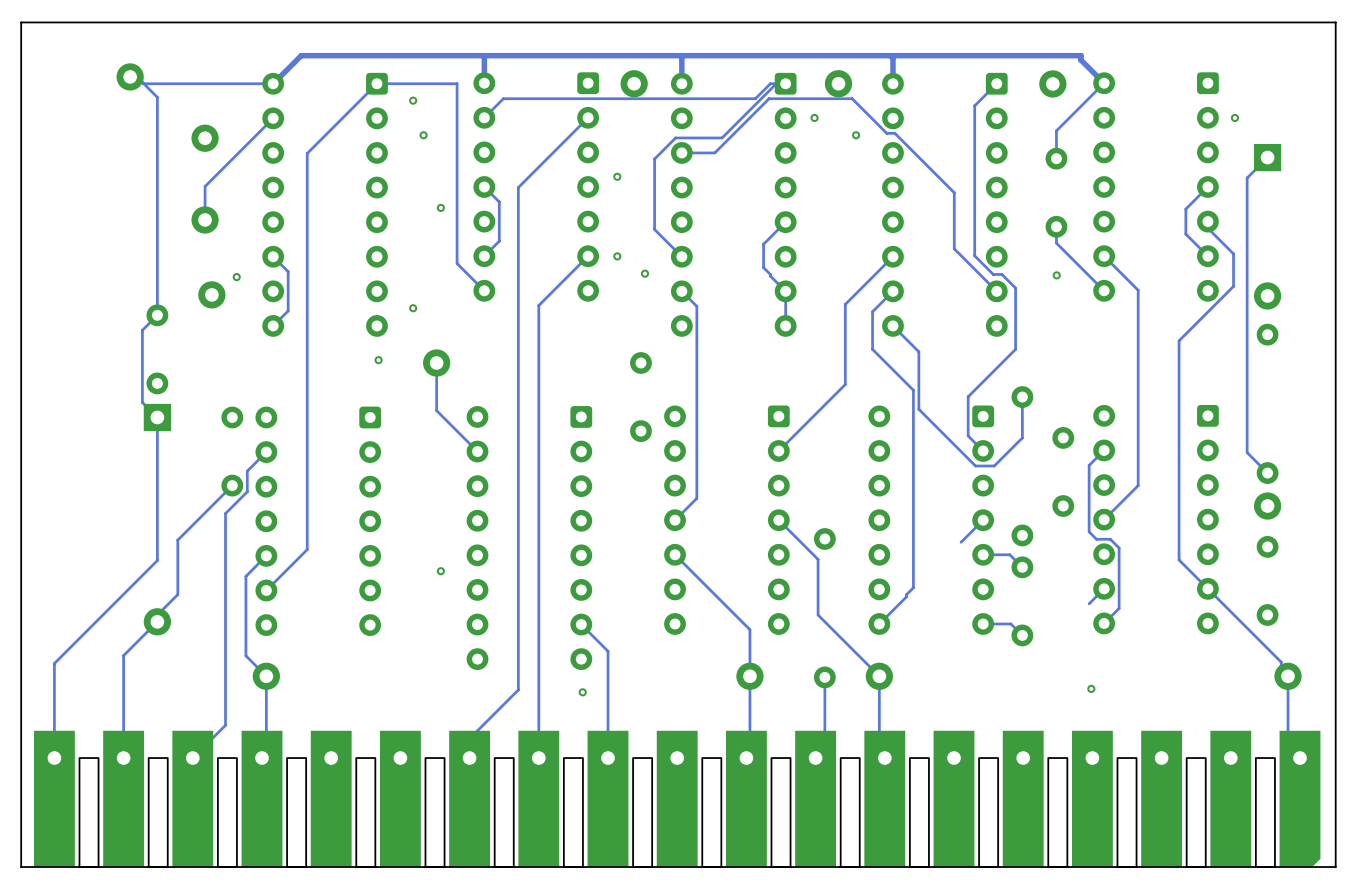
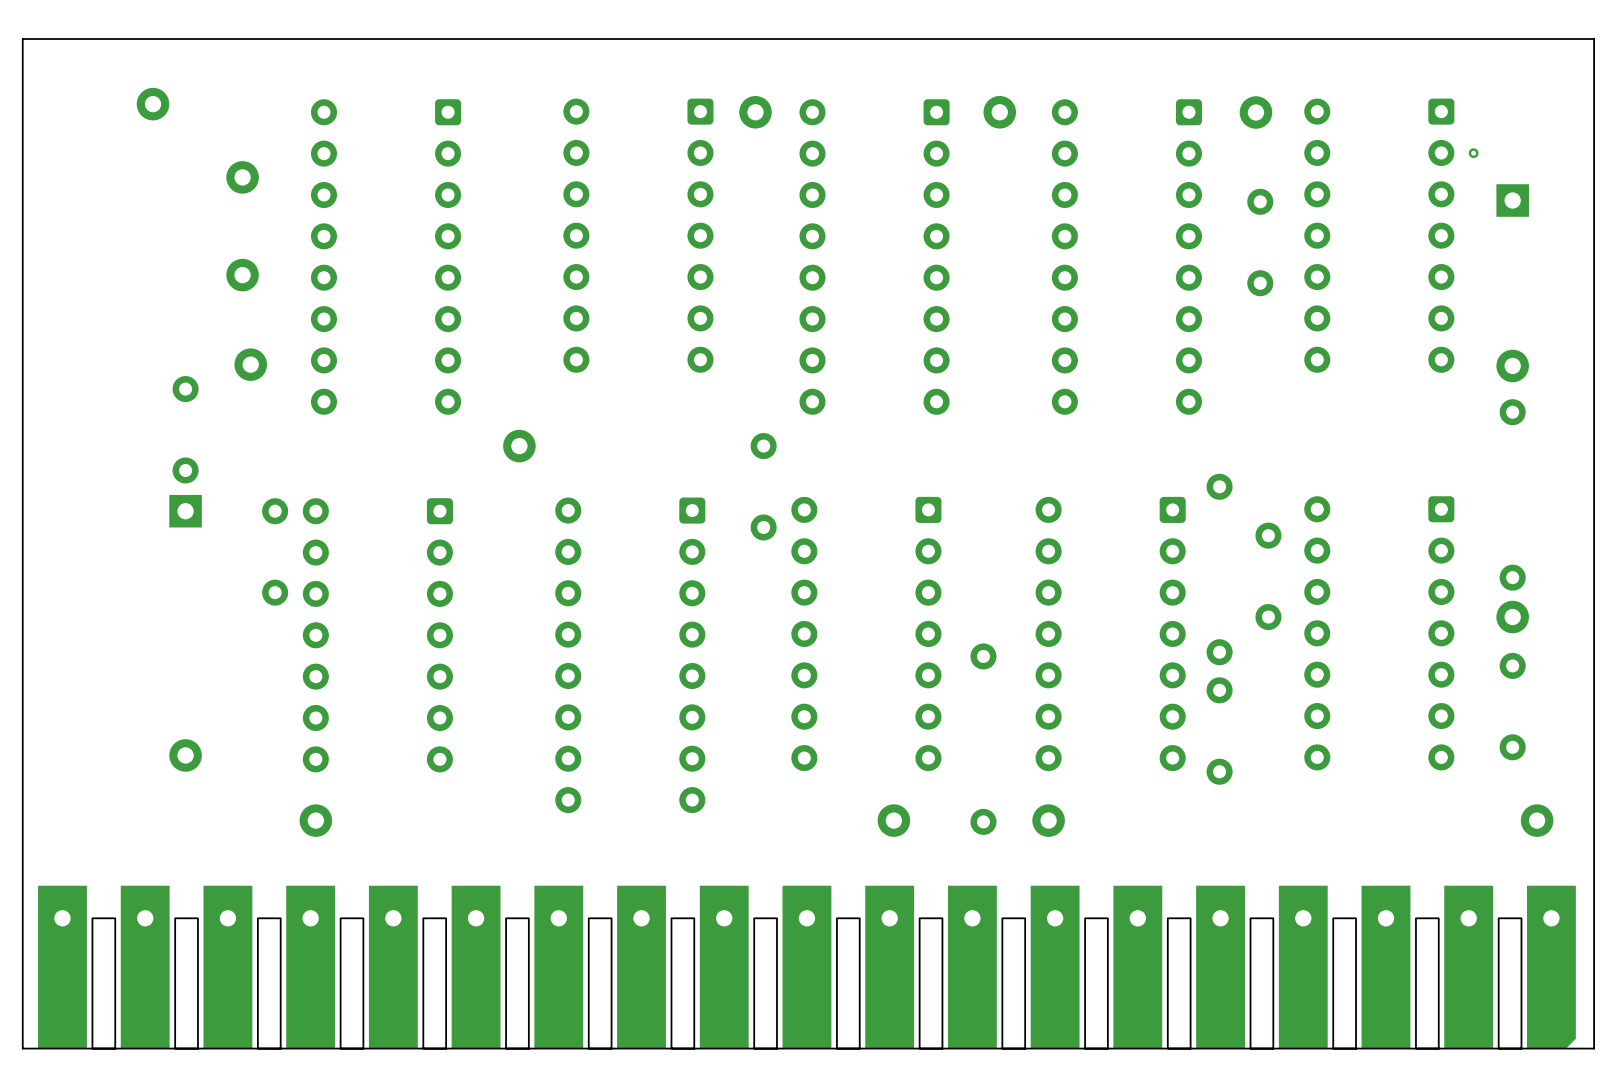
track: (484, 55) (484, 83) -> none
track: (683, 55) (681, 83) -> none
track: (890, 55) (892, 58) (892, 83) -> none
track: (130, 76) (136, 76) (157, 97) (157, 315) (142, 330) (142, 402) (157, 417) (157, 560) (54, 663) (54, 758) -> none
track: (143, 83) (273, 83) (301, 55) (1080, 55) (1080, 60) (1104, 83) (1056, 130) (1056, 158) -> none
track: (776, 83) (722, 137) (675, 137) (654, 158) (654, 229) (681, 256) -> none
track: (785, 83) (770, 83) (755, 98) (503, 98) (484, 117) -> none
track: (996, 83) (974, 105) (974, 255) (993, 274) (1001, 274) (1015, 288) (1015, 349) (968, 396) (968, 436) (983, 450) -> none
via: (413, 100) -> none
track: (588, 117) (518, 187) (518, 689) (469, 738) (469, 758) -> none
via: (814, 117) -> none
track: (273, 118) (205, 186) (205, 219) -> none
via: (423, 135) -> none
via: (856, 135) -> none
track: (681, 152) (714, 152) (769, 98) (852, 98) (886, 133) (894, 133) (954, 192) (954, 248) (996, 291) -> none
track: (1267, 157) (1247, 178) (1247, 452) (1267, 473) -> none
via: (617, 176) -> none
track: (484, 187) (499, 201) (499, 241) (484, 256) -> none
track: (1207, 187) (1185, 209) (1185, 234) (1207, 256) -> none
via: (440, 207) -> none
track: (1207, 221) (1207, 228) (1233, 253) (1233, 286) (1179, 340) (1179, 559) (1281, 662) (1281, 669) (1288, 676) (1288, 746) (1300, 758) -> none
track: (785, 222) (763, 244) (763, 267) (785, 291) (785, 325) -> none
track: (1056, 226) (1056, 243) (1104, 290) -> none
track: (273, 256) (288, 271) (288, 310) (273, 325) -> none
track: (588, 256) (538, 305) (538, 758) -> none
via: (617, 256) -> none
track: (892, 256) (845, 304) (845, 384) (778, 450) -> none
track: (1104, 256) (1138, 290) (1138, 485) (1104, 519) -> none
via: (645, 273) -> none
via: (1056, 275) -> none
via: (236, 277) -> none
track: (484, 290) (457, 263) (457, 83) (376, 83) (307, 153) (307, 549) (266, 590) -> none
track: (681, 291) (696, 306) (696, 498) (675, 520) -> none
track: (892, 291) (872, 311) (872, 349) (913, 390) (913, 587) (879, 623) -> none
via: (413, 308) -> none
track: (892, 325) (918, 351) (918, 409) (975, 465) (994, 465) (1022, 437) (1022, 397) -> none
via: (378, 360) -> none
track: (436, 362) (436, 410) (477, 451) -> none
track: (1104, 450) (1089, 465) (1089, 531) (1096, 539) (1110, 539) (1119, 548) (1119, 608) (1104, 623) -> none
track: (266, 452) (247, 471) (247, 491) (225, 513) (225, 725) (192, 758) -> none
track: (232, 485) (177, 540) (177, 594) (157, 615) (157, 621) (123, 655) (123, 758) -> none
track: (778, 520) (818, 559) (818, 615) (879, 676) (879, 752) (884, 758) -> none
track: (983, 520) (961, 542) -> none
track: (675, 554) (749, 629) (749, 754) (746, 758) -> none
track: (983, 554) (1009, 554) (1022, 567) -> none
track: (266, 555) (245, 576) (245, 655) (266, 676) (266, 753) (262, 758) -> none
via: (440, 571) -> none
track: (1104, 588) (1089, 603) -> none
track: (983, 623) (1010, 623) (1022, 635) -> none
track: (581, 624) (608, 651) (608, 758) -> none
track: (824, 677) (824, 748) (815, 758) -> none
via: (1091, 688) -> none
via: (582, 692) -> none

